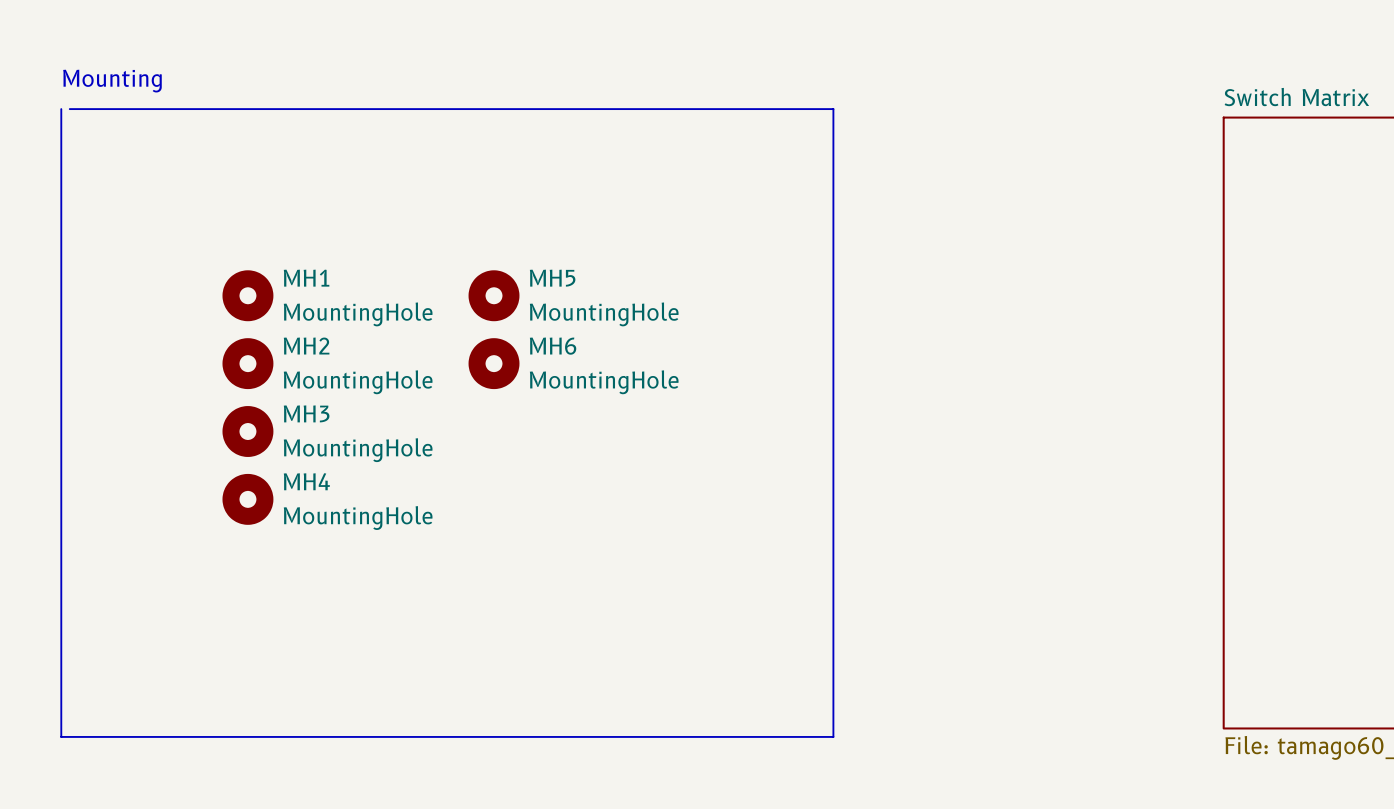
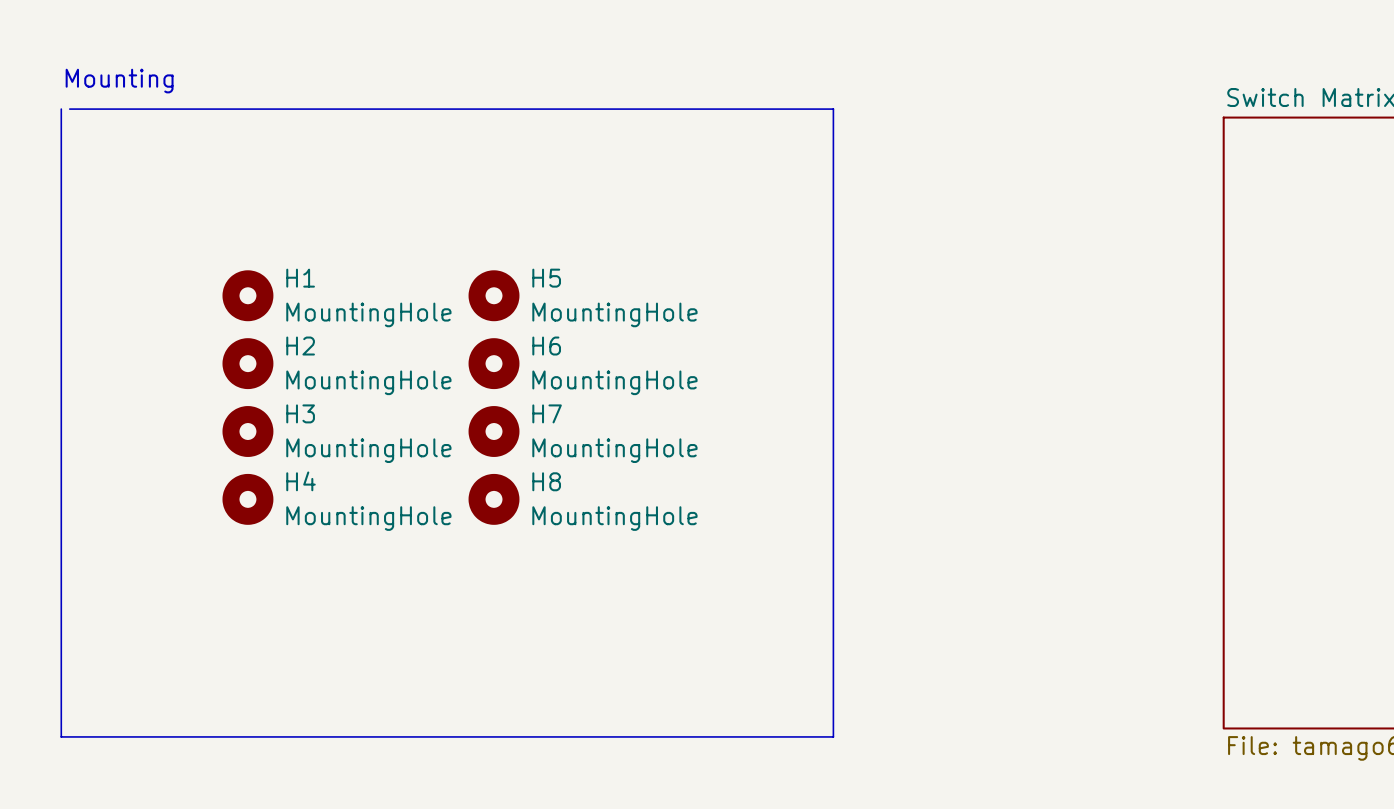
MH1 name: MH1 (306, 278) -> H1 (300, 278)
MH5 name: MH5 (552, 278) -> H5 (546, 278)
MH2 name: MH2 (306, 346) -> H2 (300, 346)
MH6 name: MH6 (553, 346) -> H6 (546, 346)
MH3 name: MH3 (306, 413) -> H3 (300, 413)
H7: none -> MountingHole (494, 431)
MH4 name: MH4 (306, 481) -> H4 (301, 481)
H8: none -> MountingHole (494, 499)

